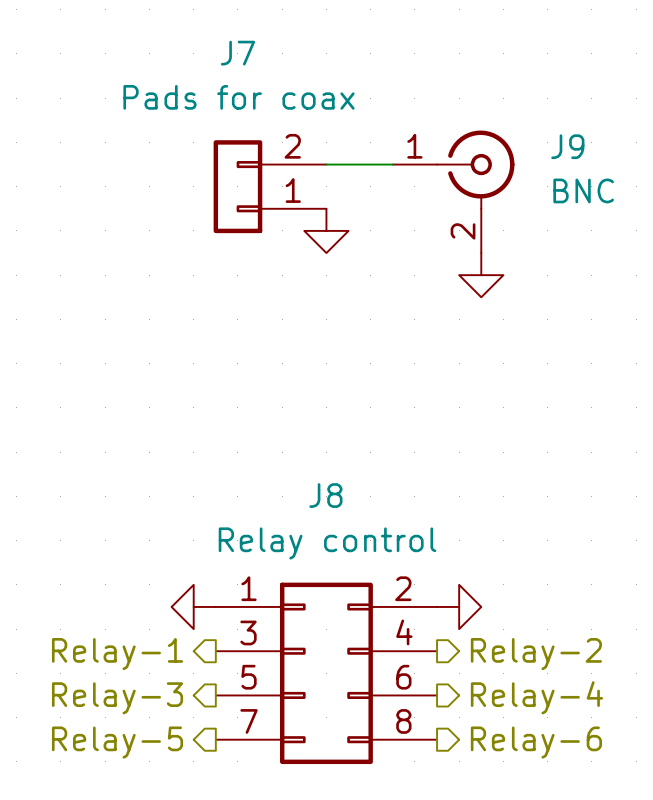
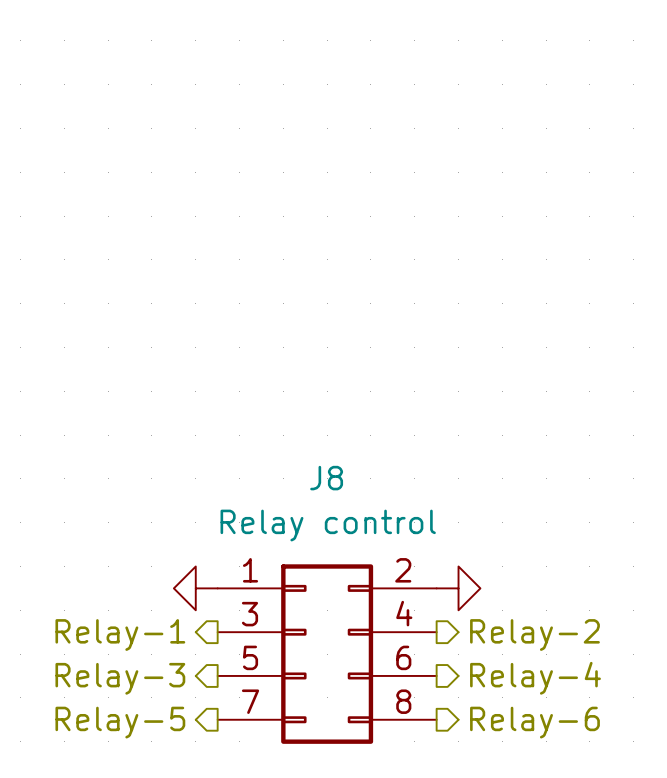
wire: (326, 164) (392, 164) -> none
J7: Pads for coax (270, 186) -> none
J9: BNC (453, 191) -> none
power symbol: (326, 230) -> none
power symbol: (481, 275) -> none

